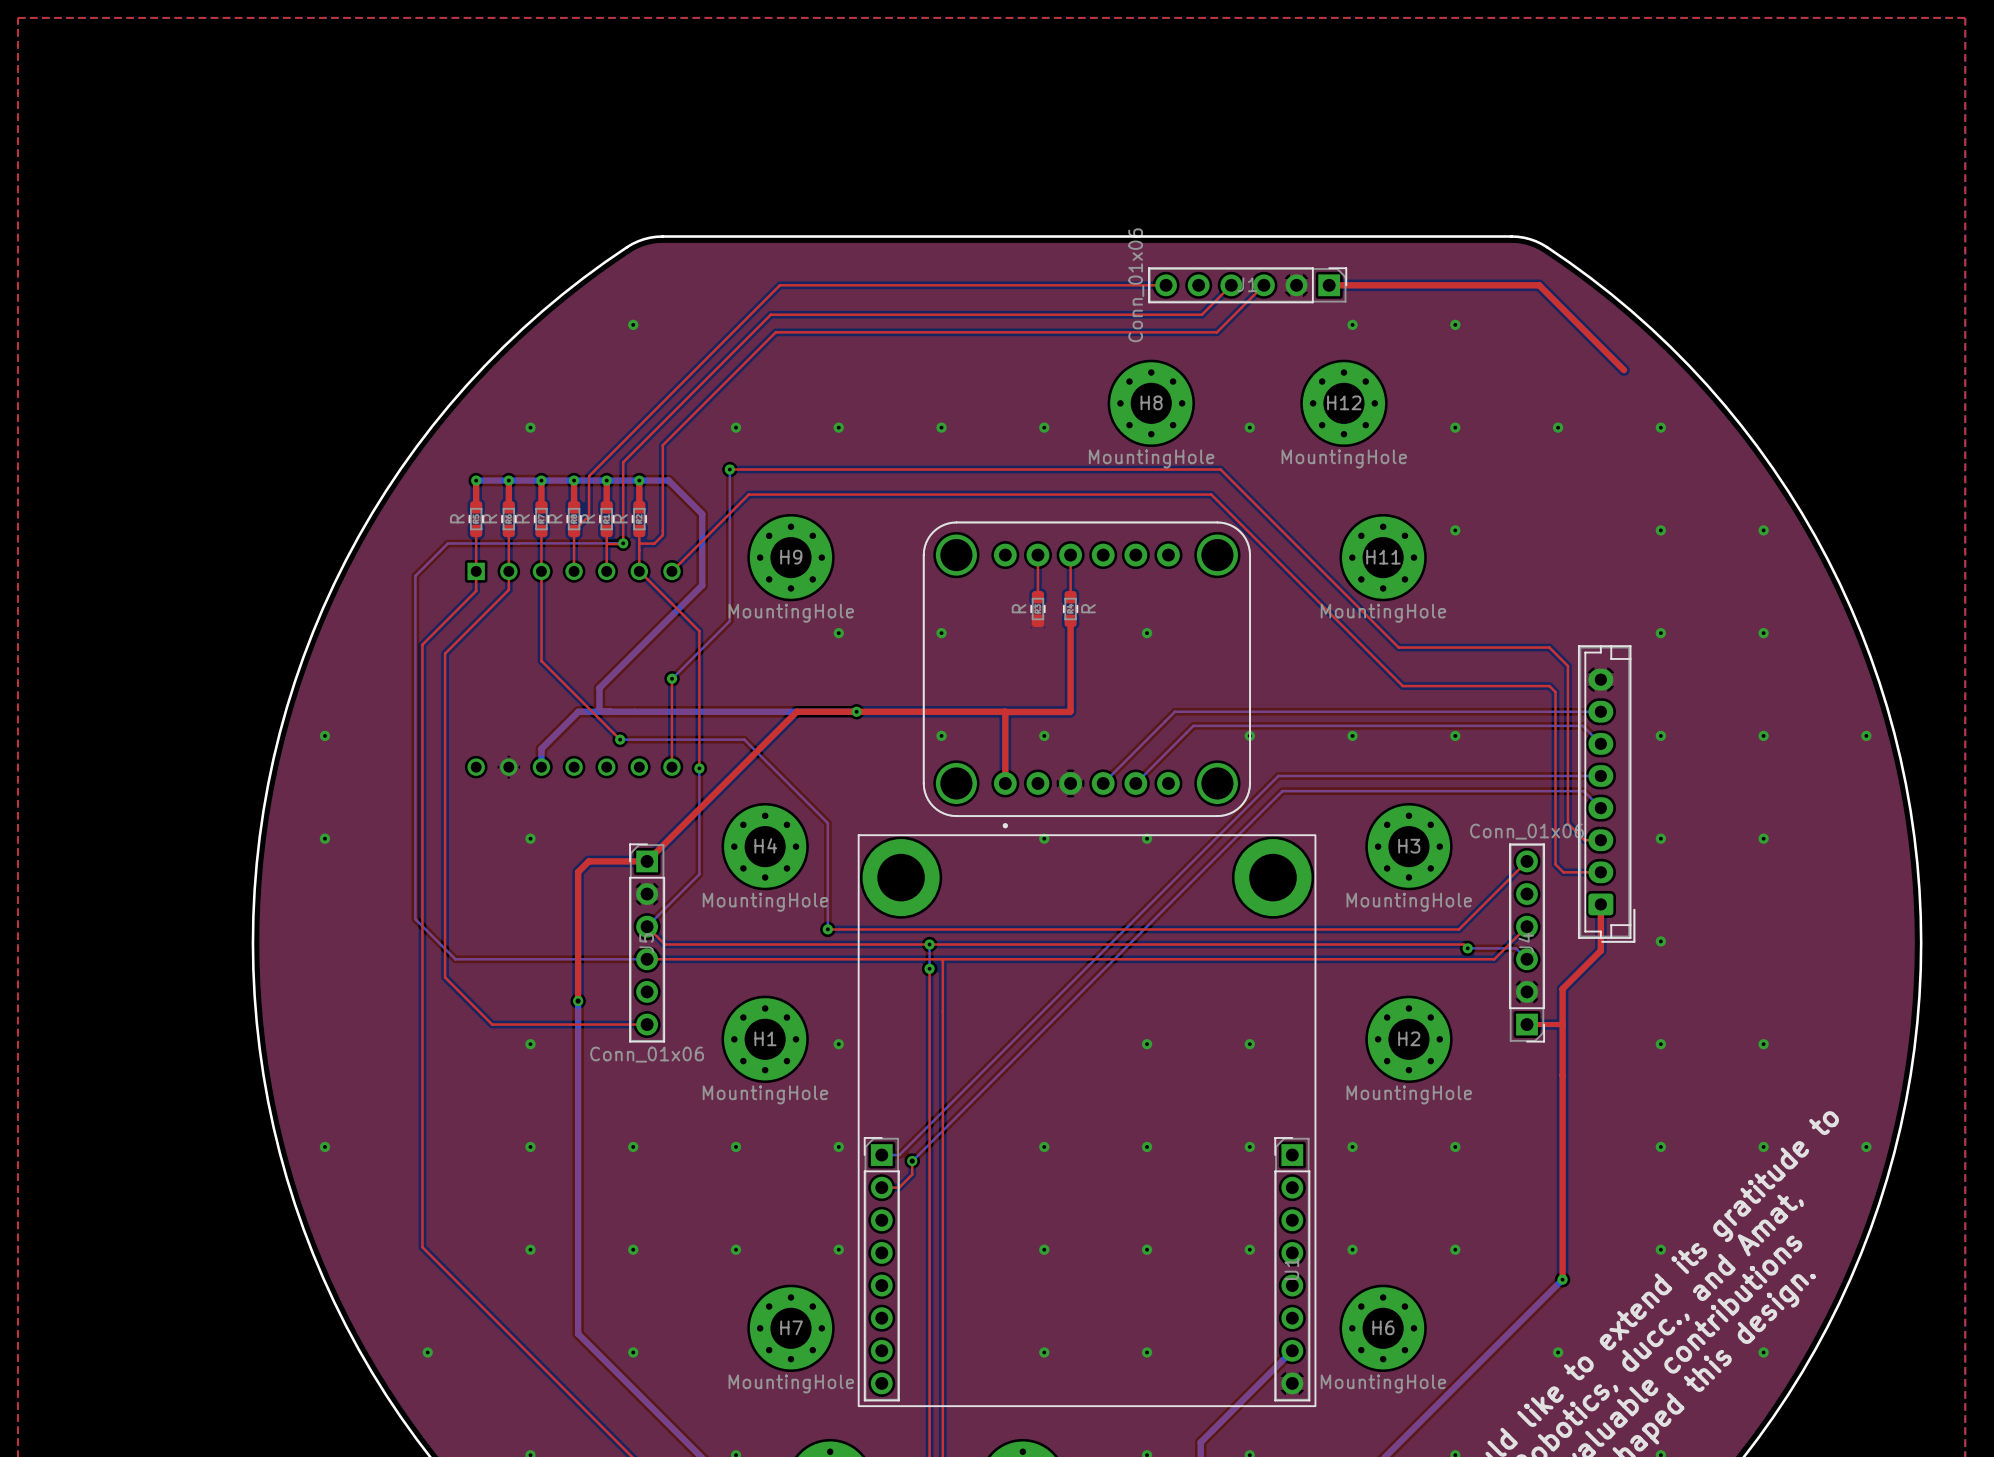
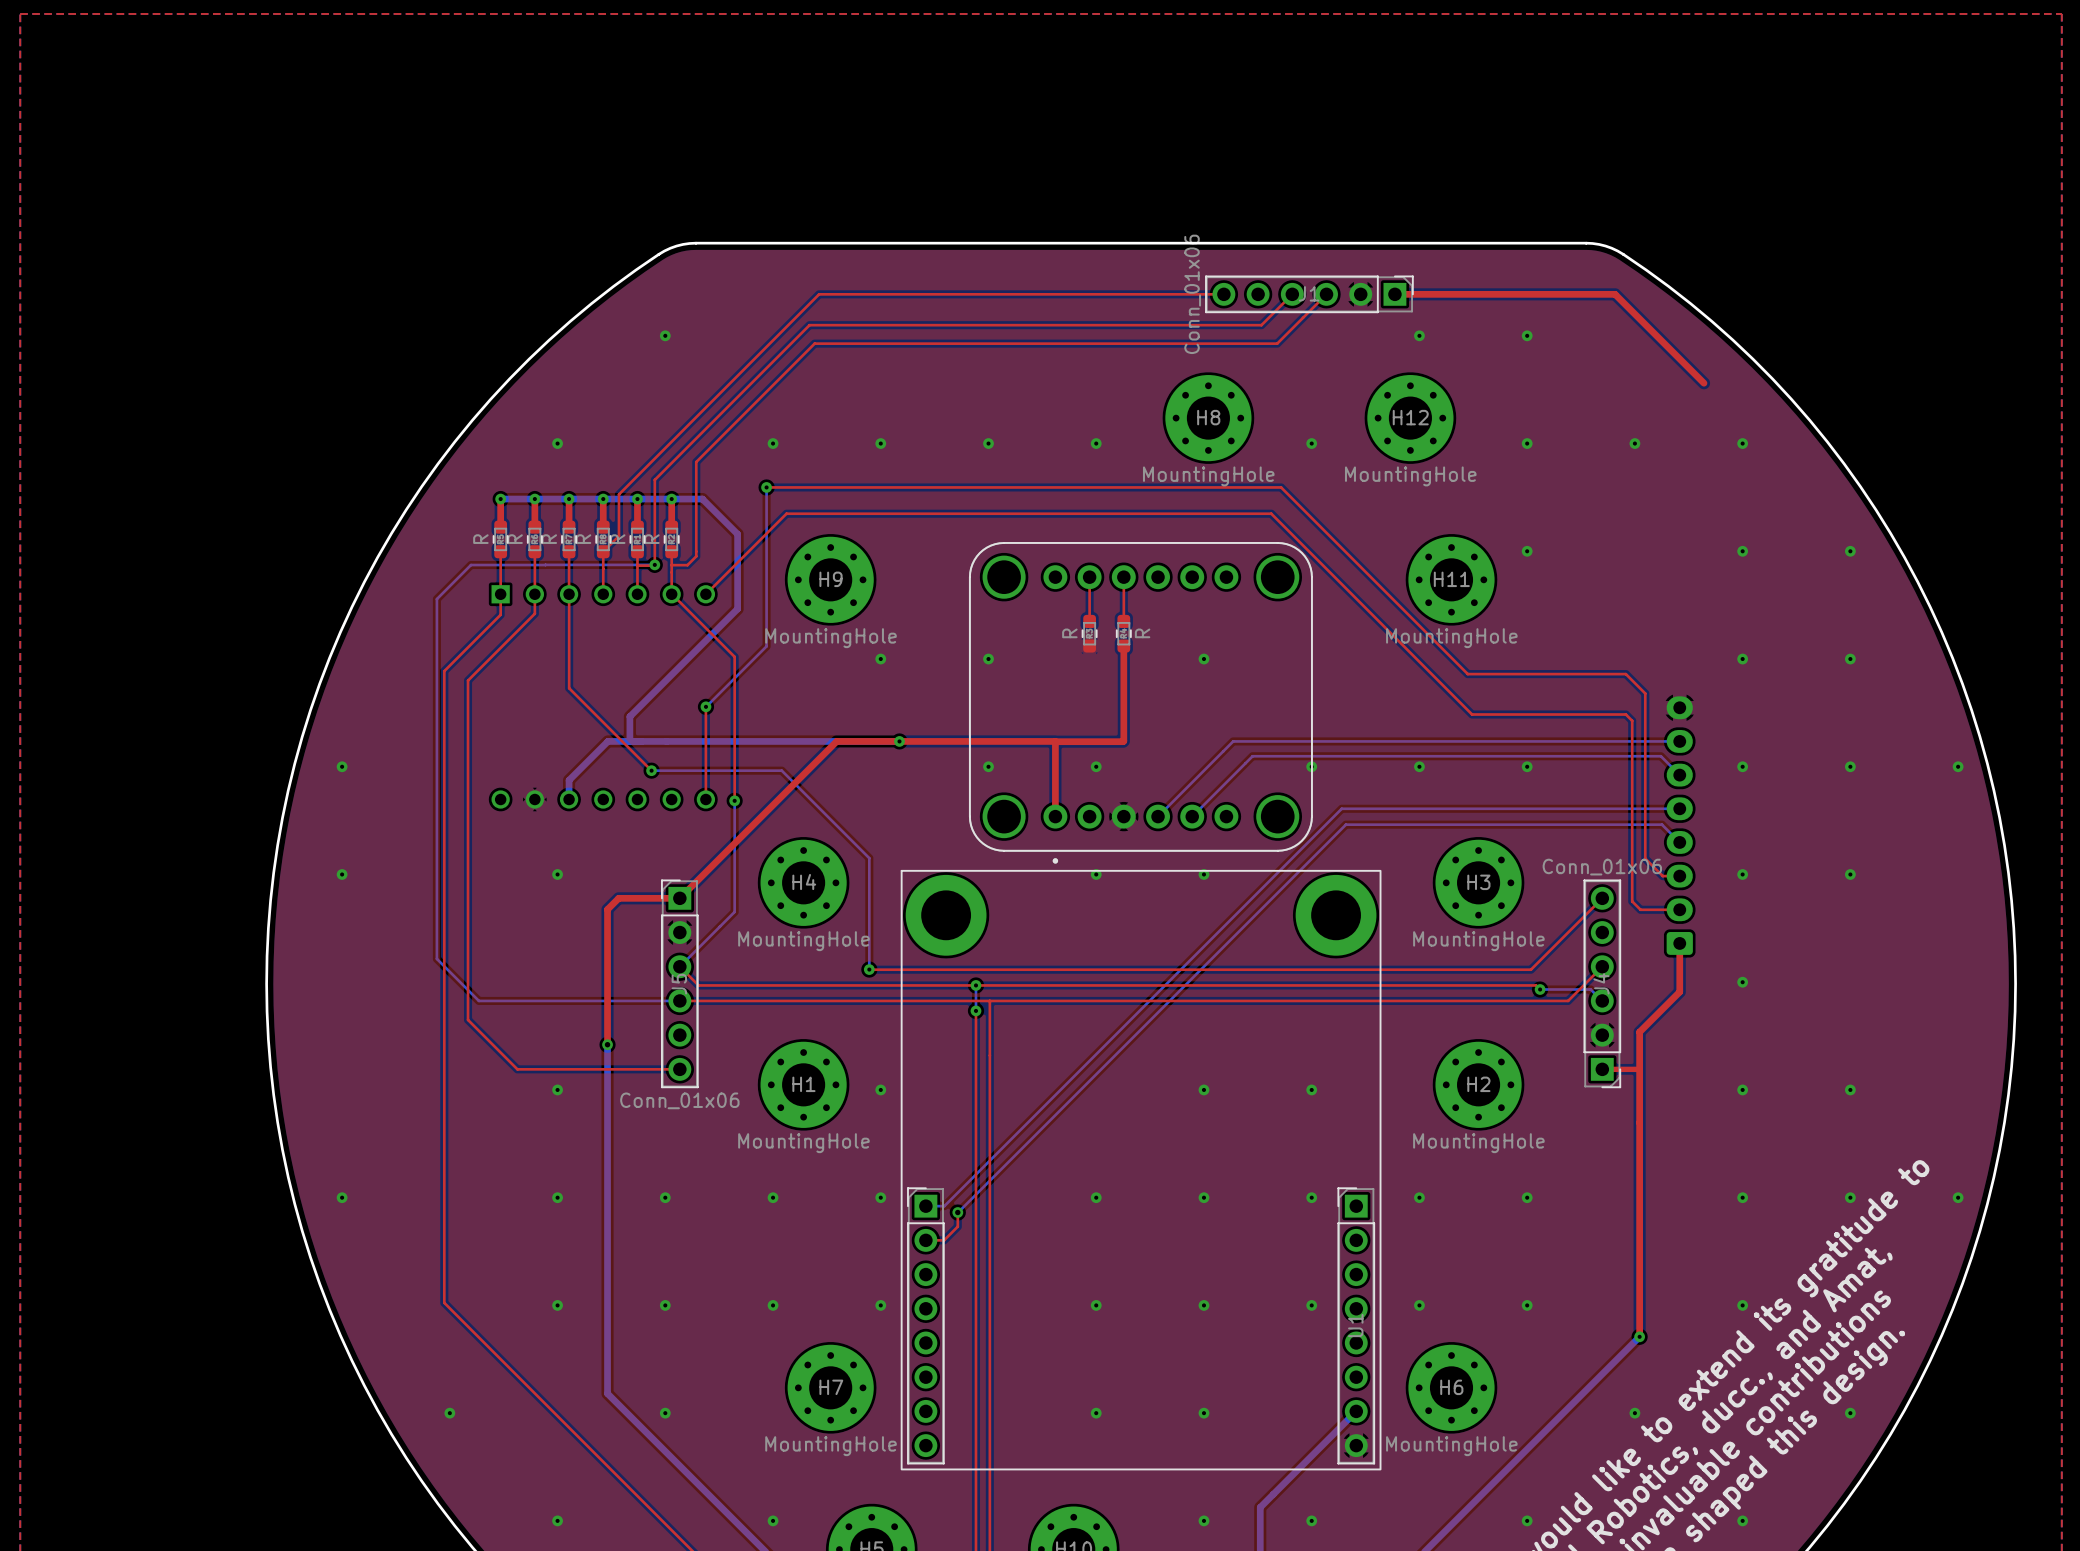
part side: top (1606, 793) -> bottom (1679, 825)

